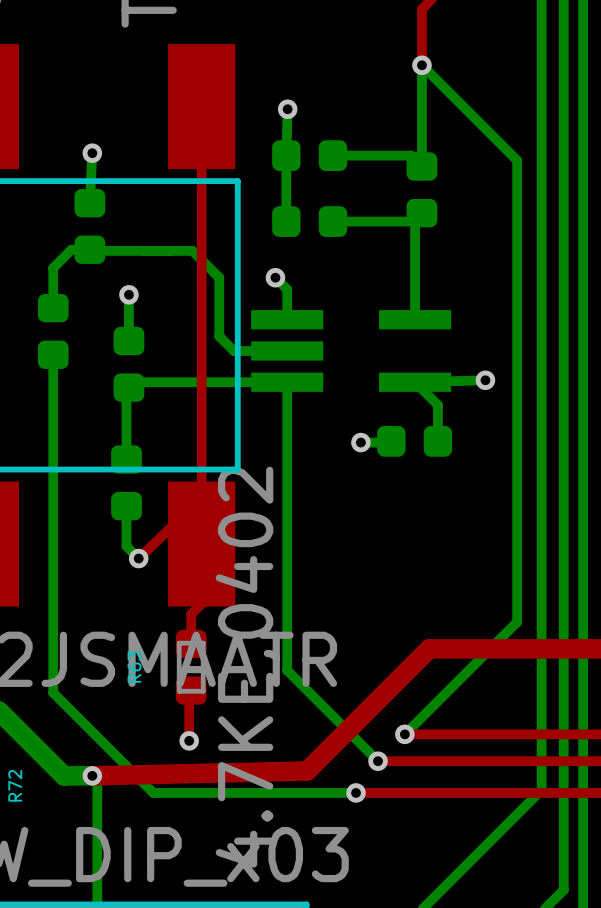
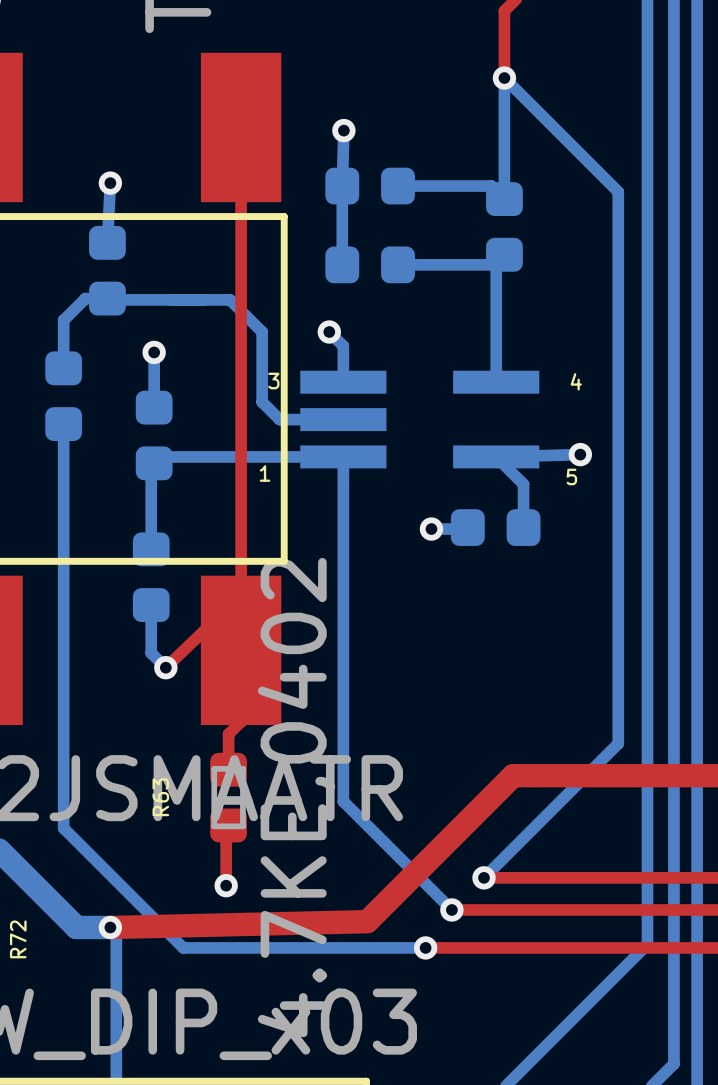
text: none -> 3 (273, 381)
text: none -> 4 (576, 381)
text: none -> 1 (265, 473)
text: none -> 5 (571, 476)

